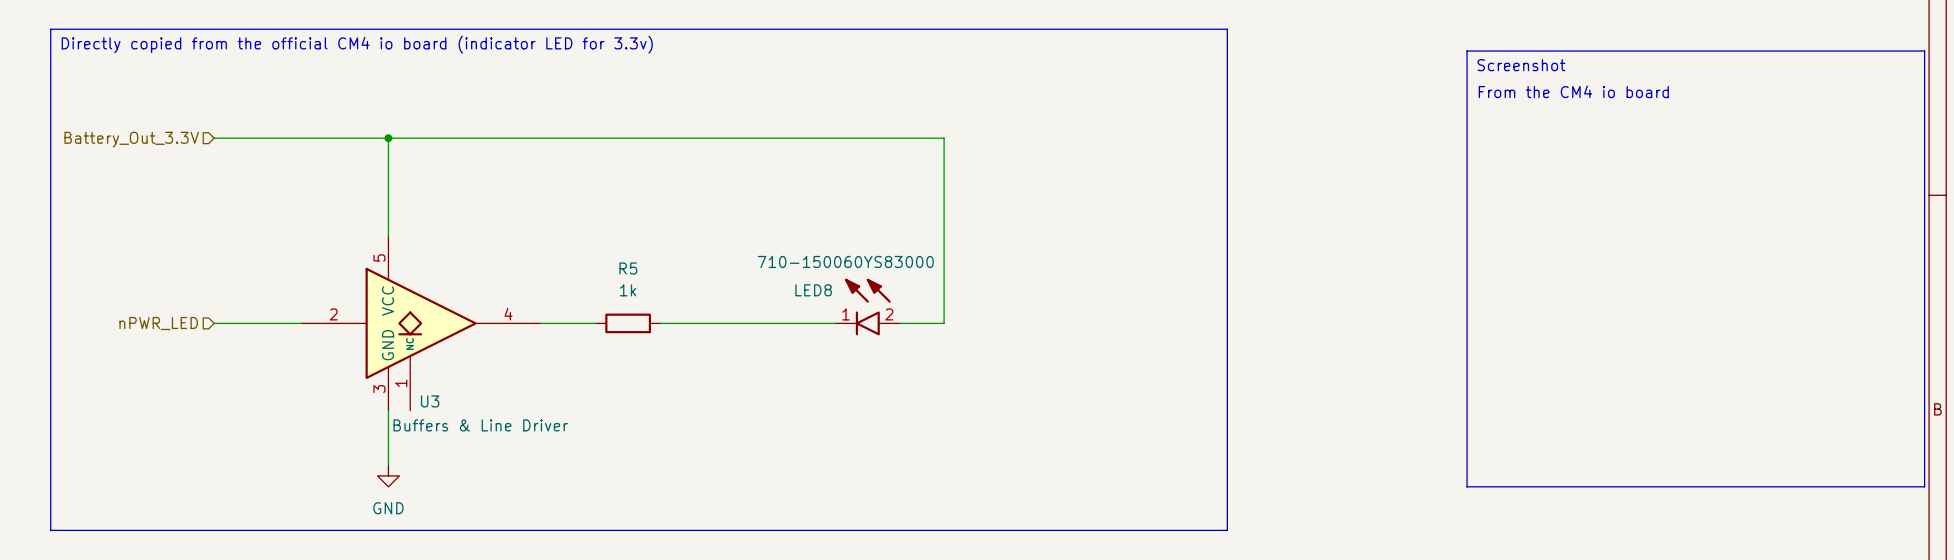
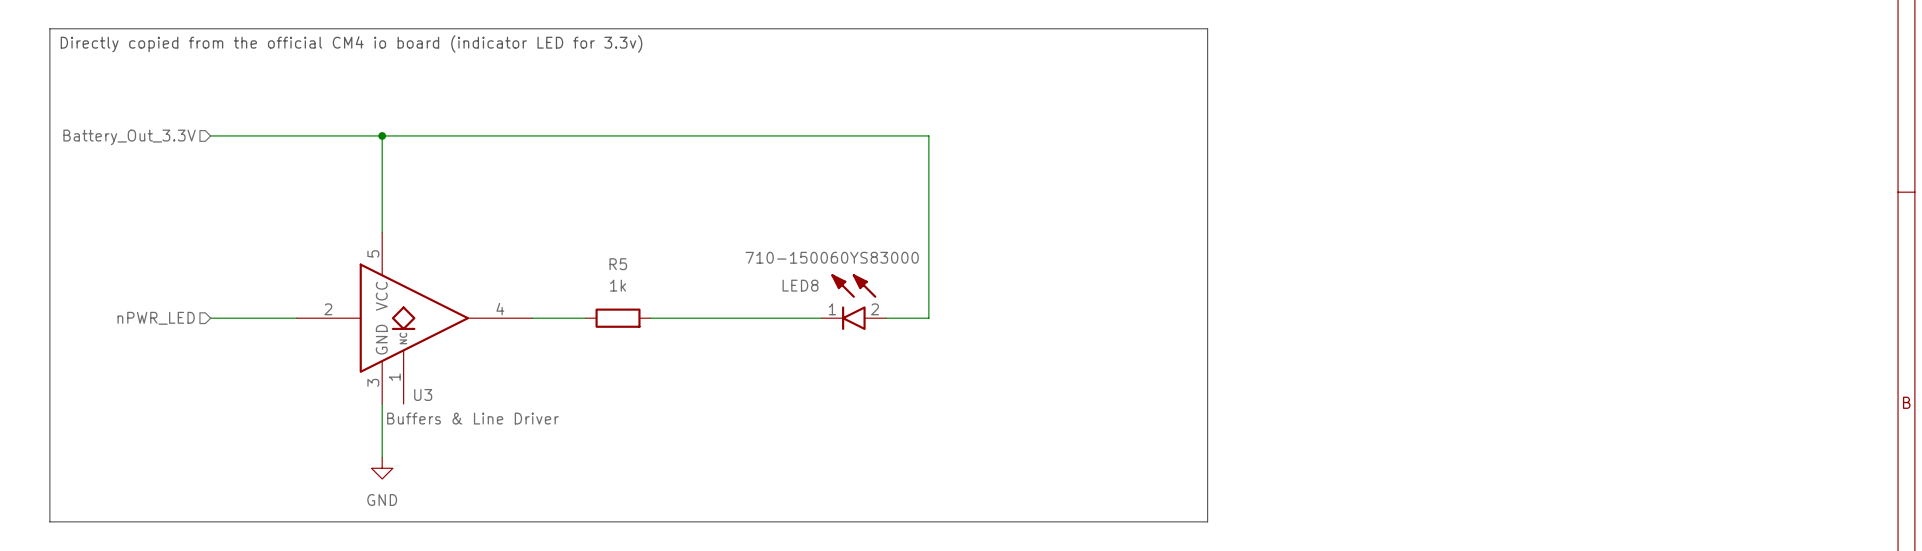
line: (1467, 51) (1924, 51) (1924, 486) (1467, 486) (1467, 51) -> none
text: Screenshot (1521, 65) -> none
text: From the CM4 io board (1573, 91) -> none

